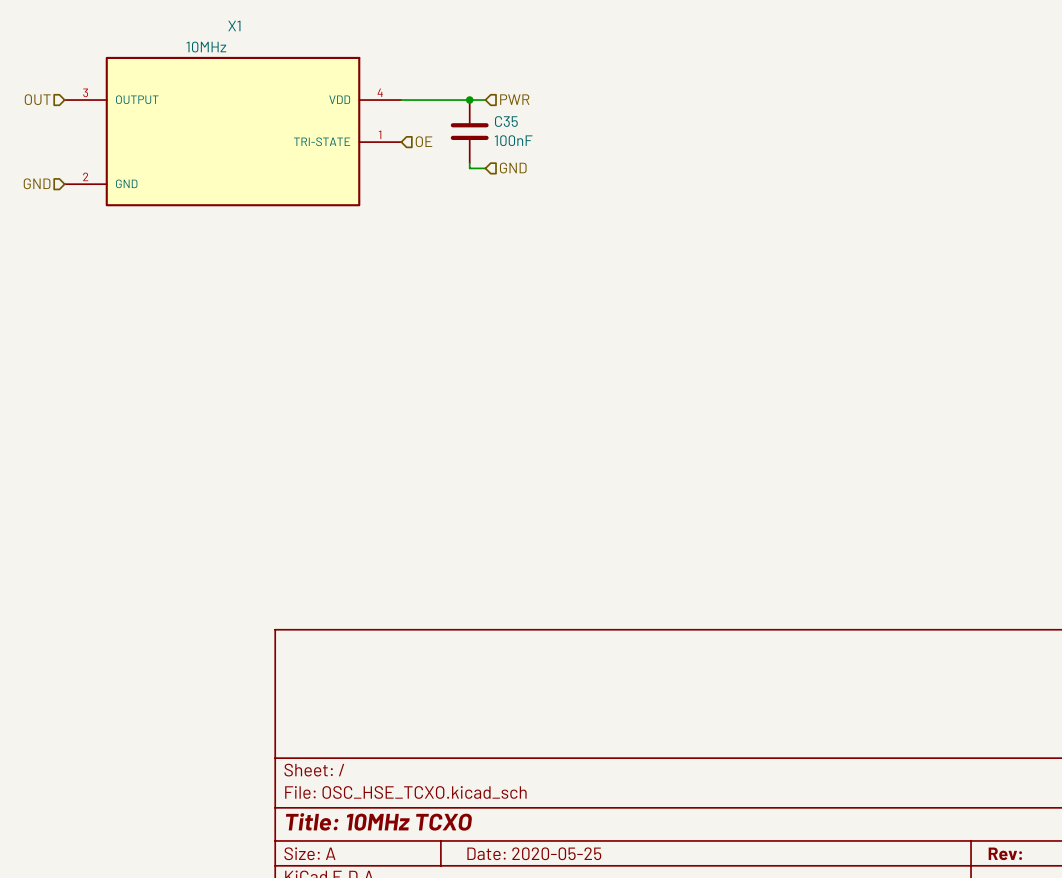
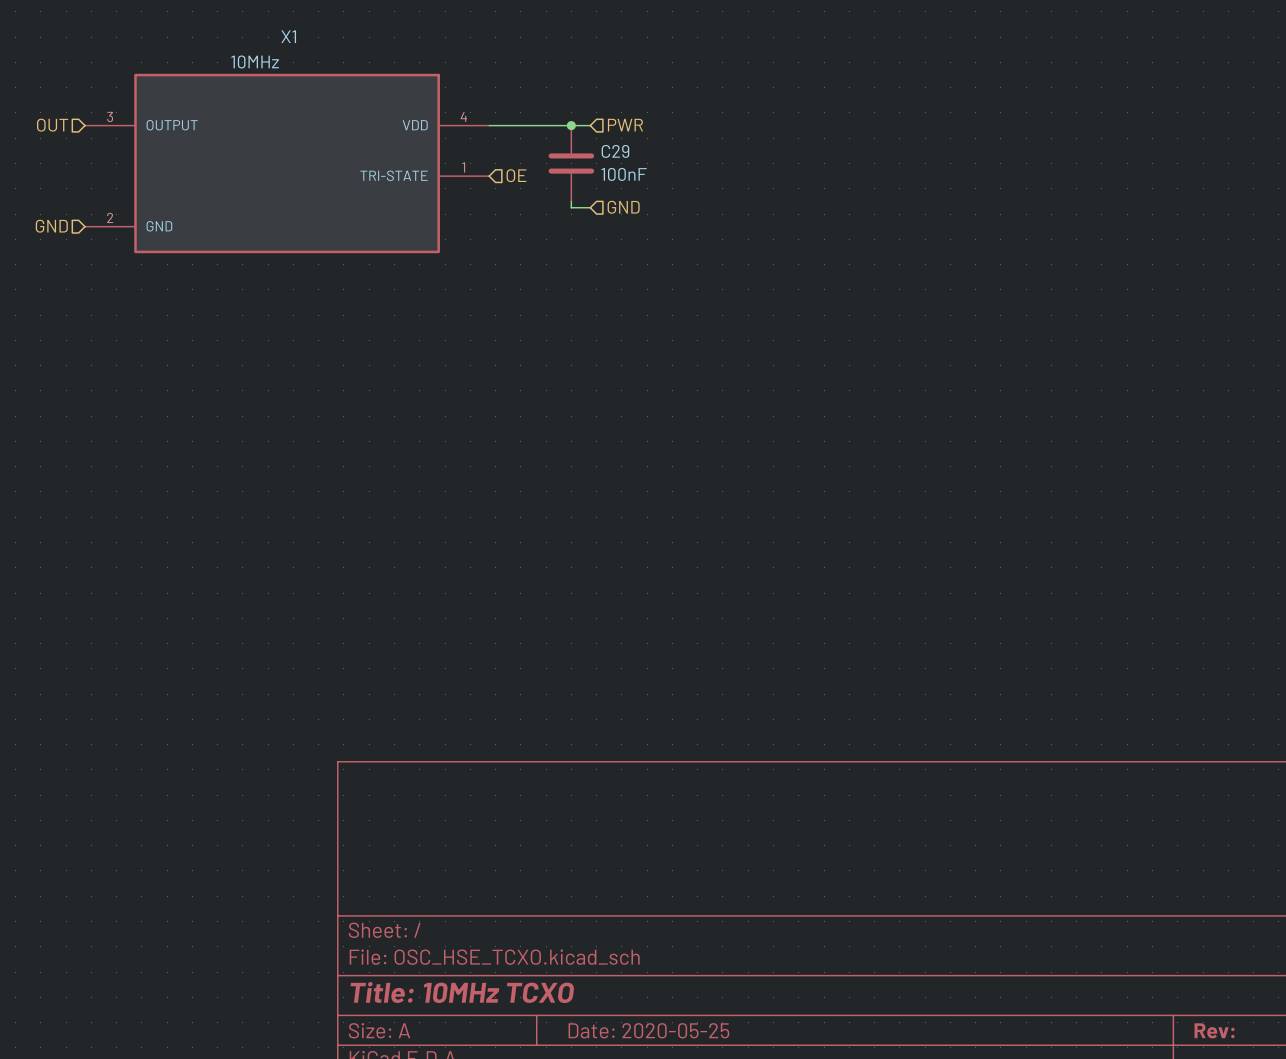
C35 name: C35 (506, 121) -> C29 (615, 151)

